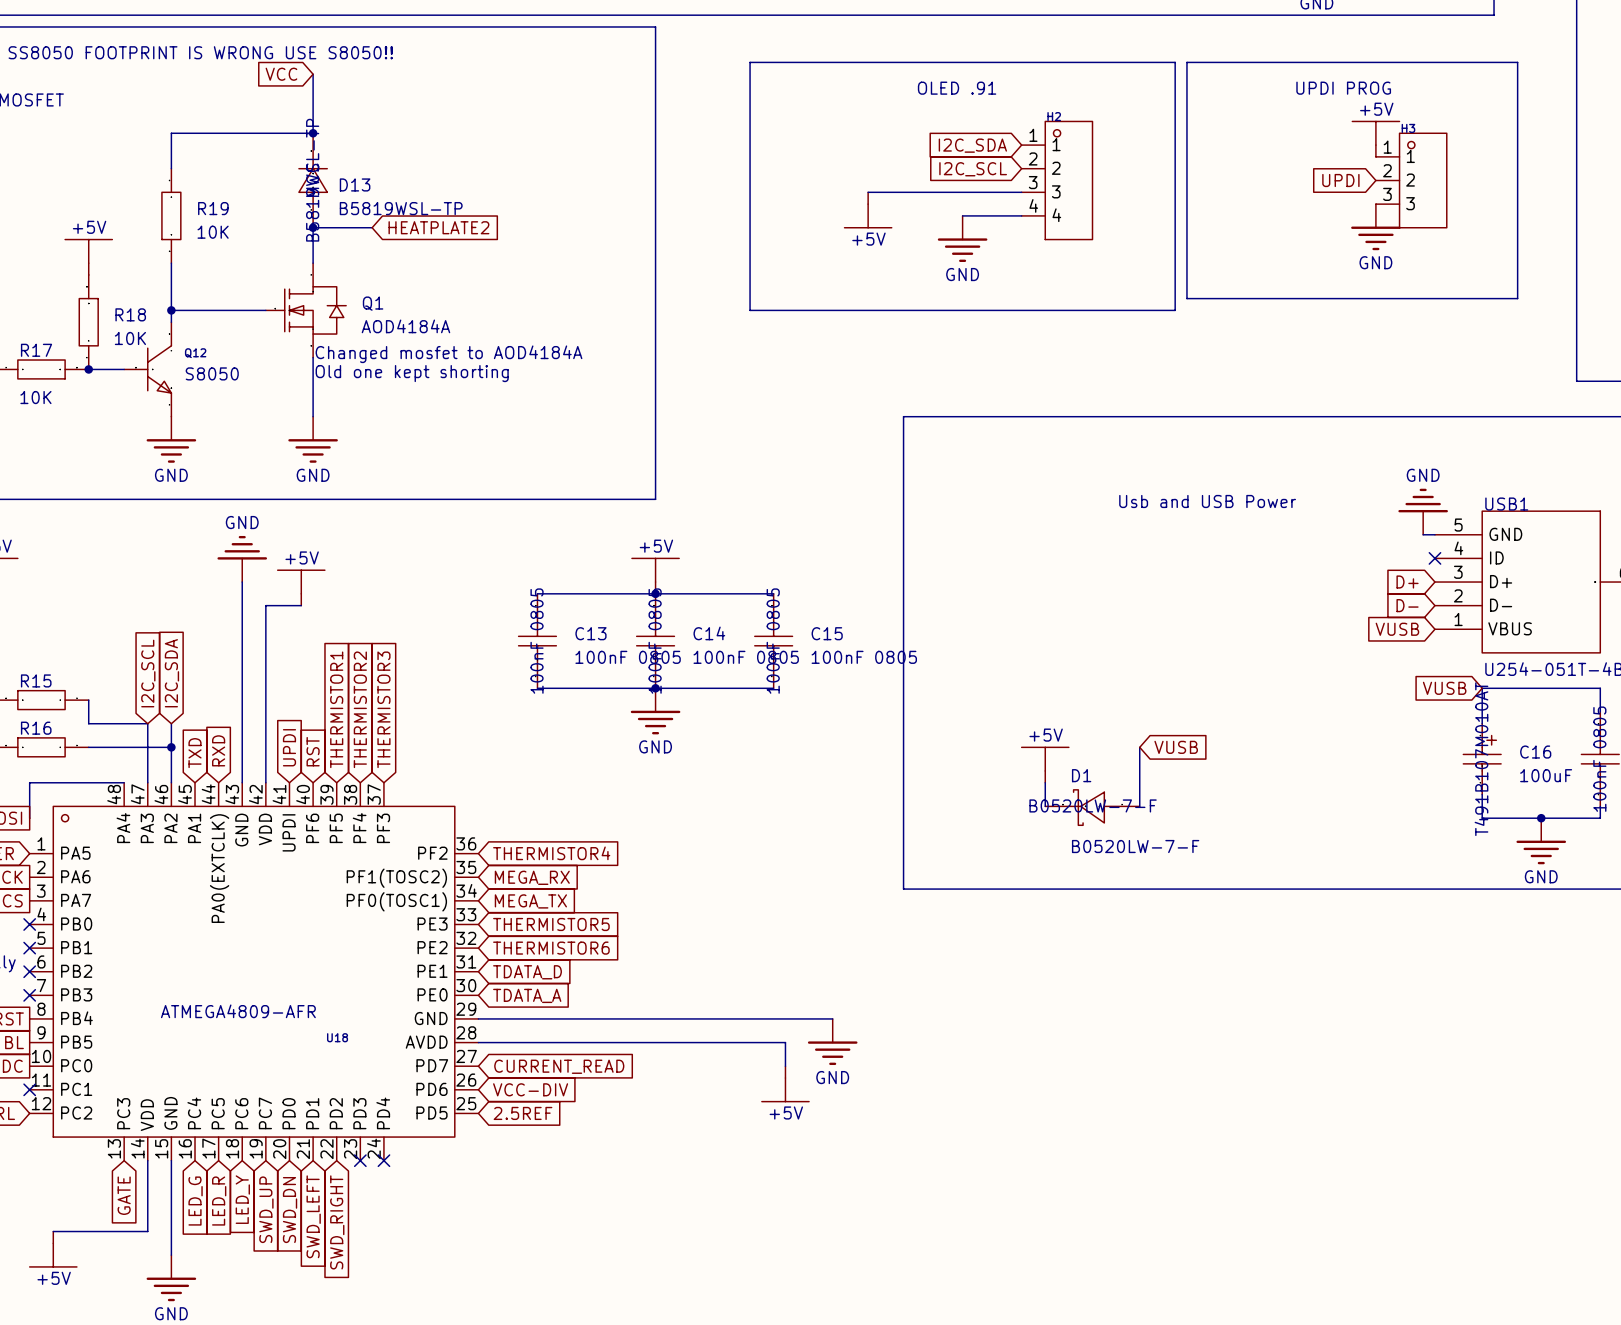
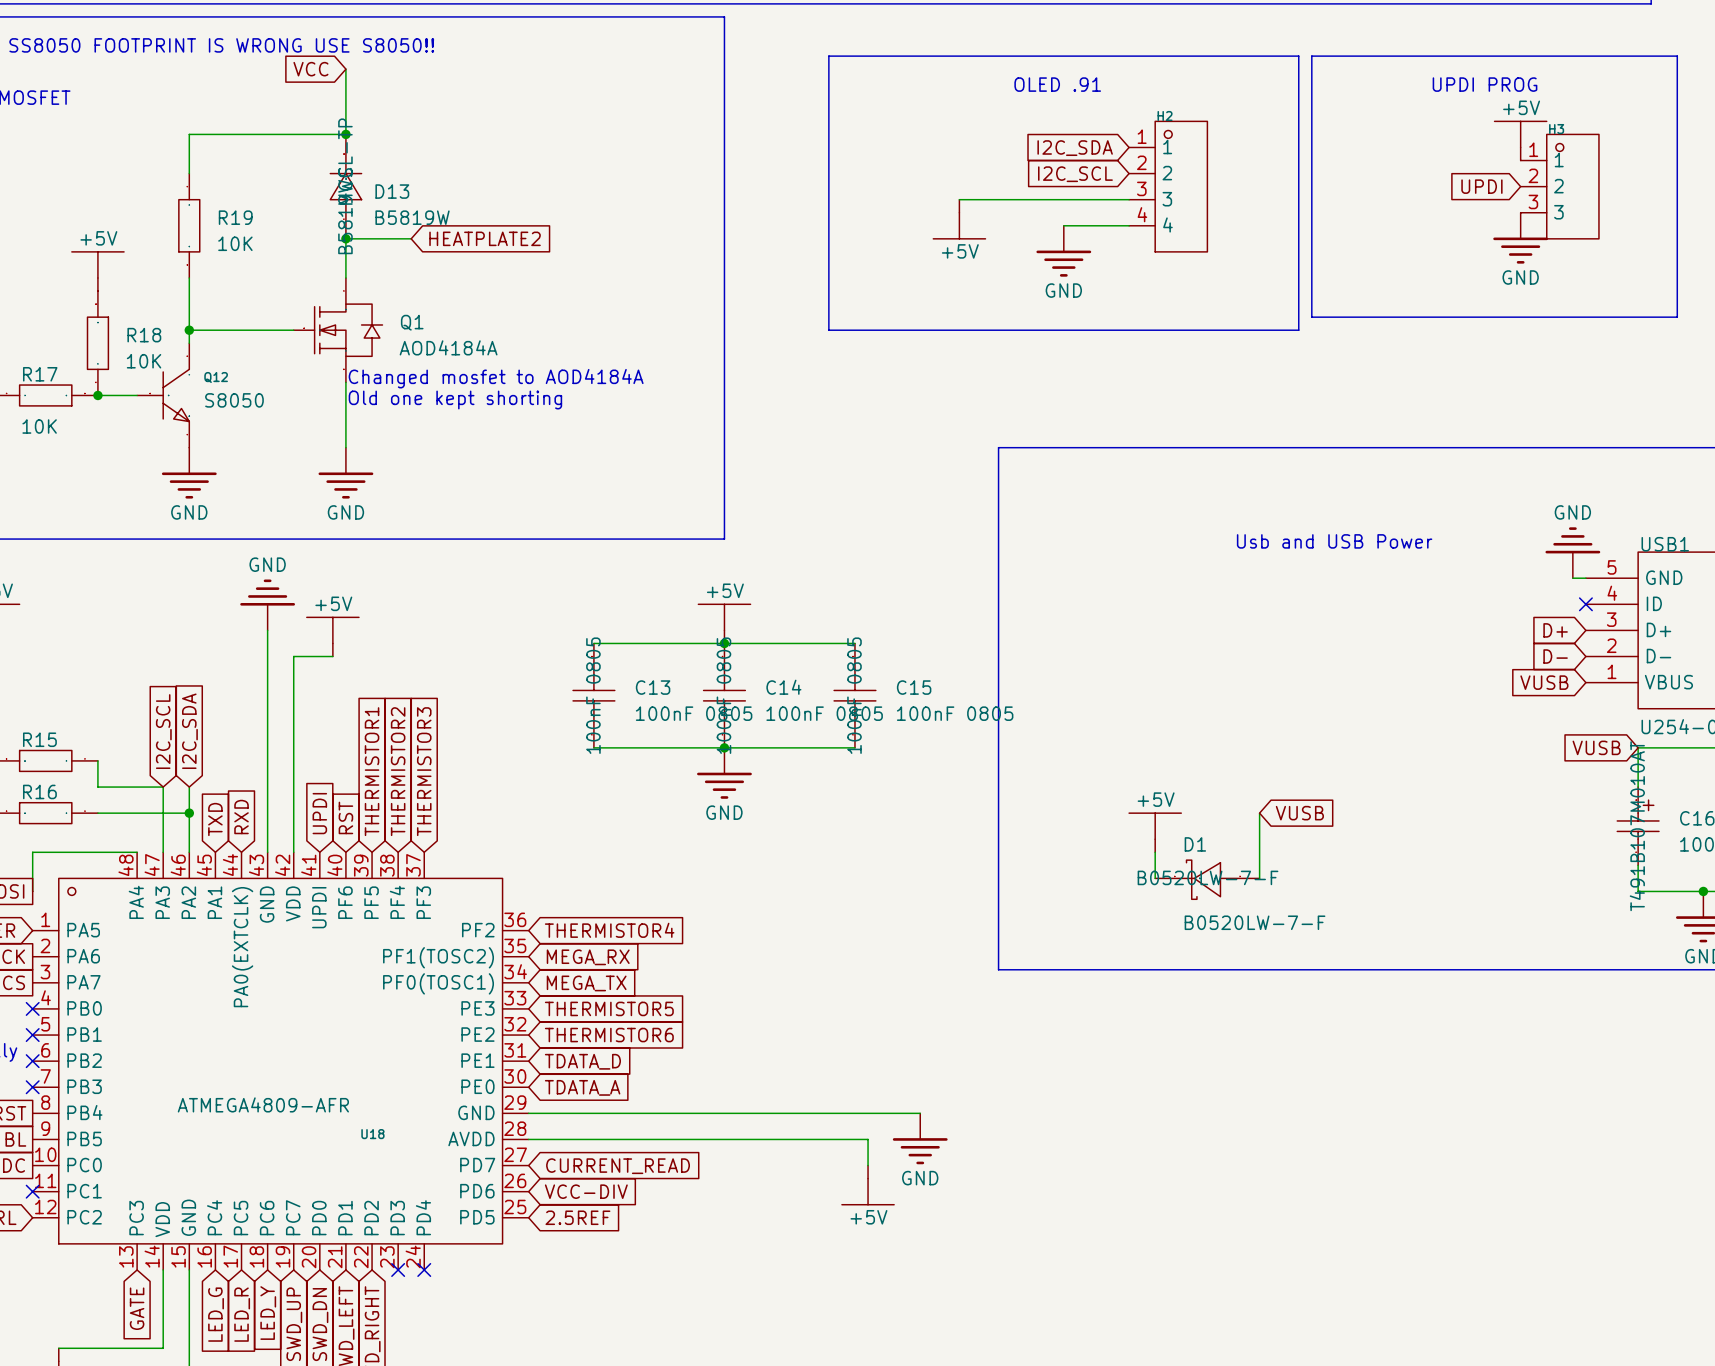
D13 value: B5819WSL-TP (401, 208) -> B5819W (412, 217)

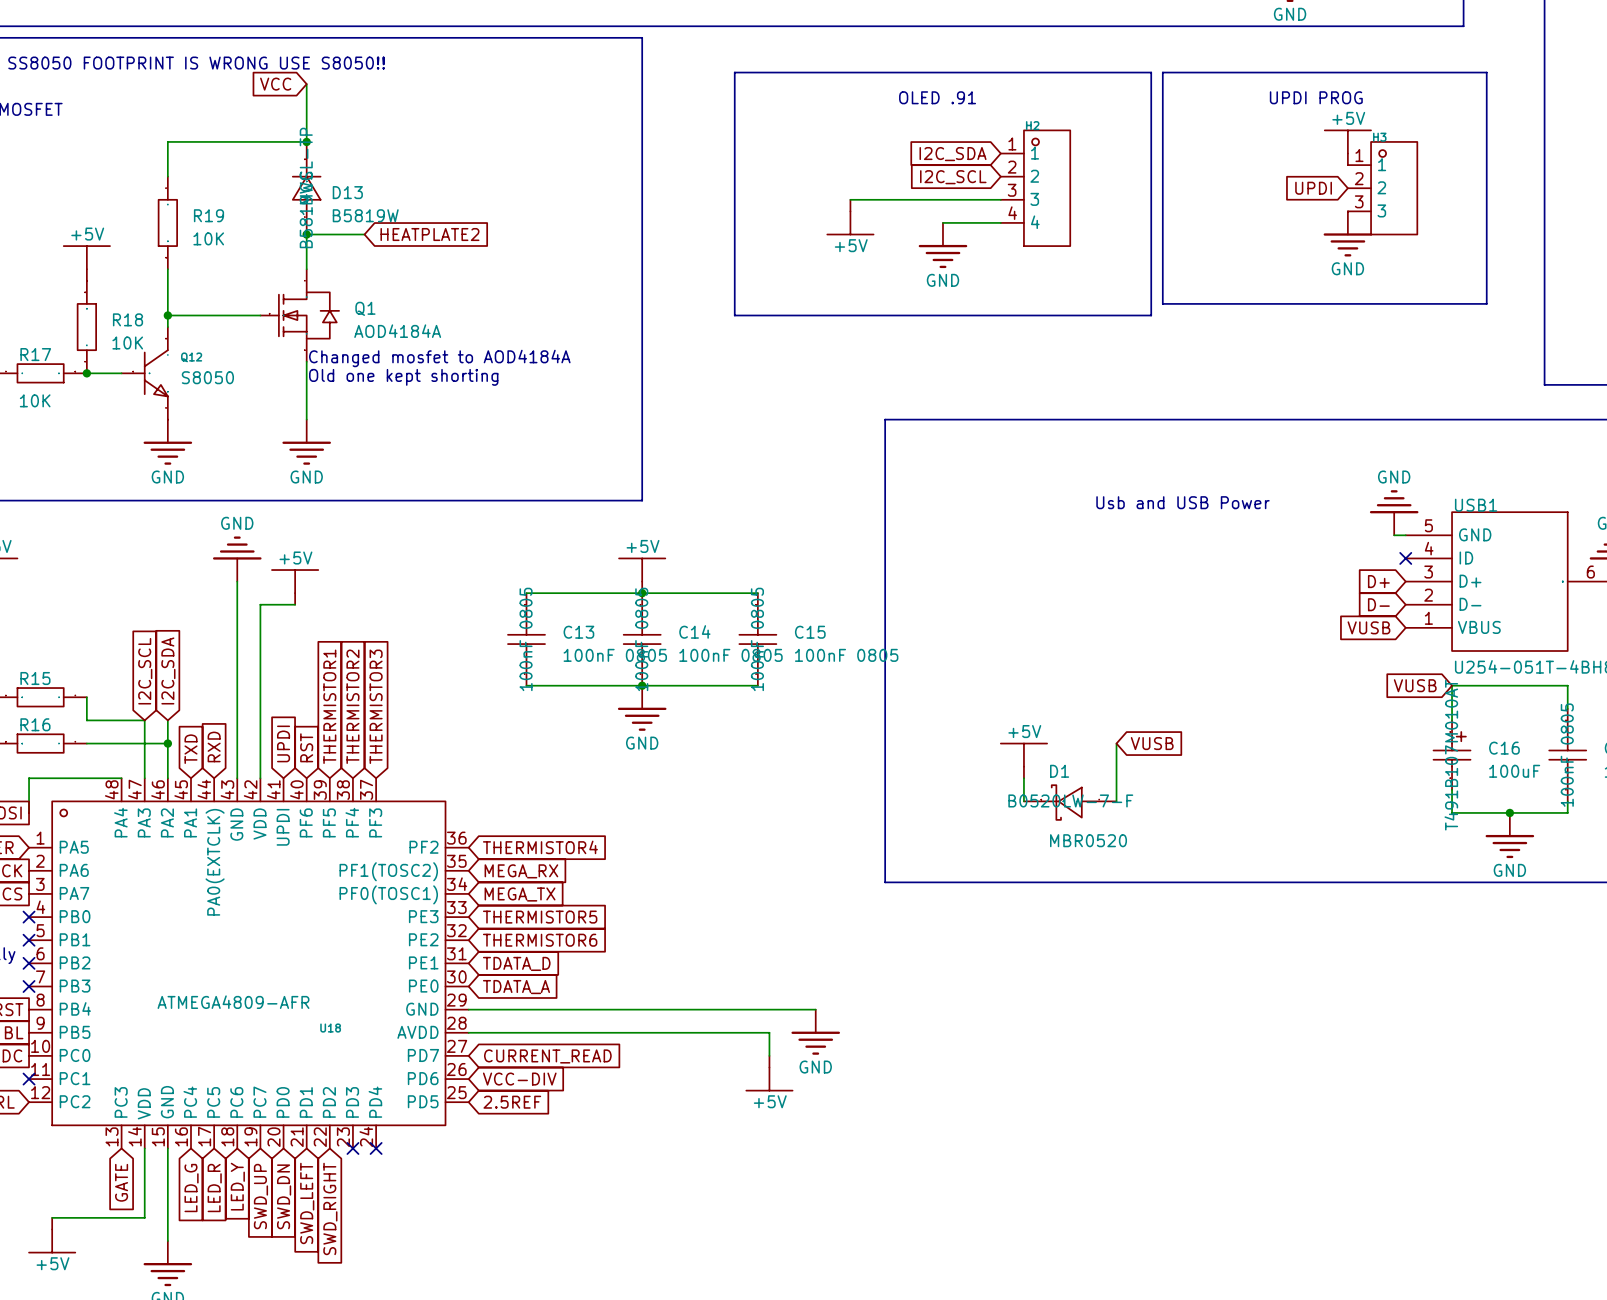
D1 value: B0520LW-7-F (1255, 922) -> MBR0520 (1088, 840)

